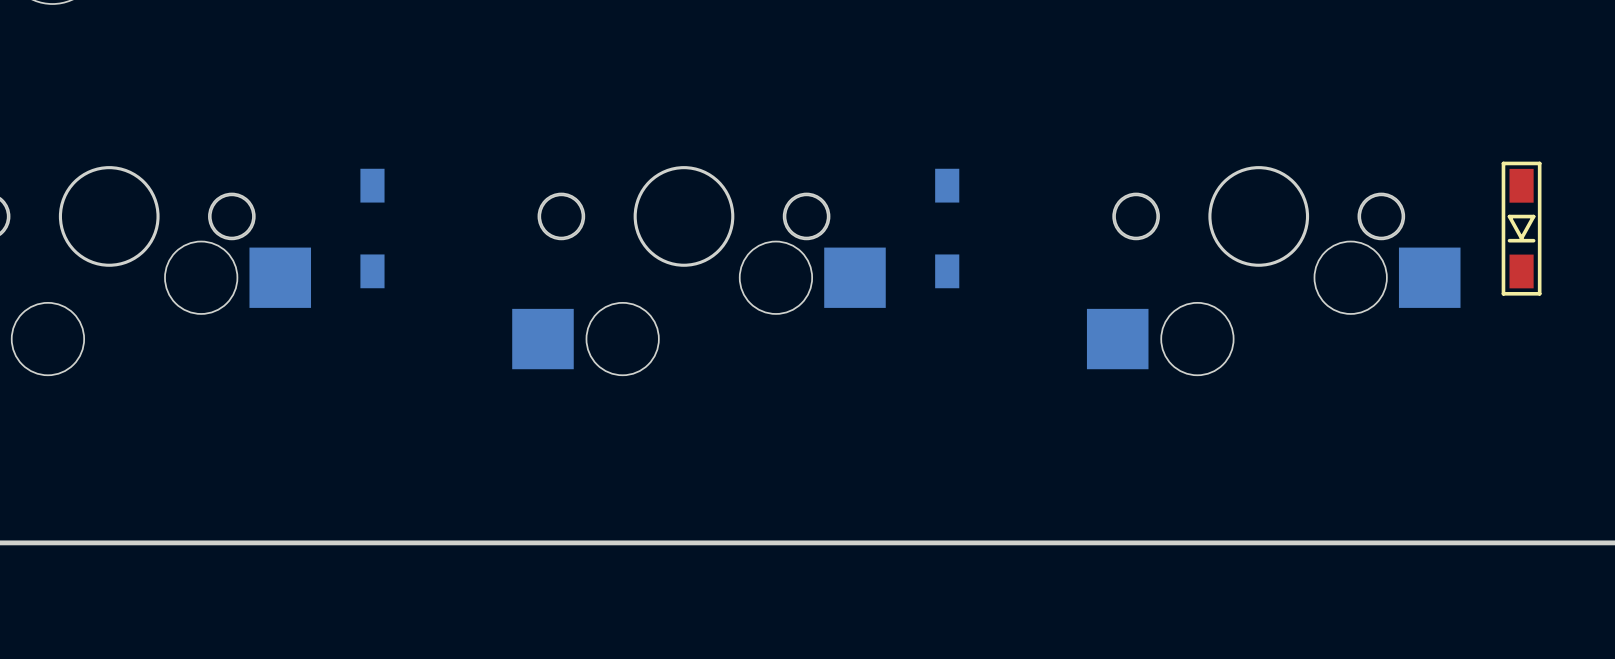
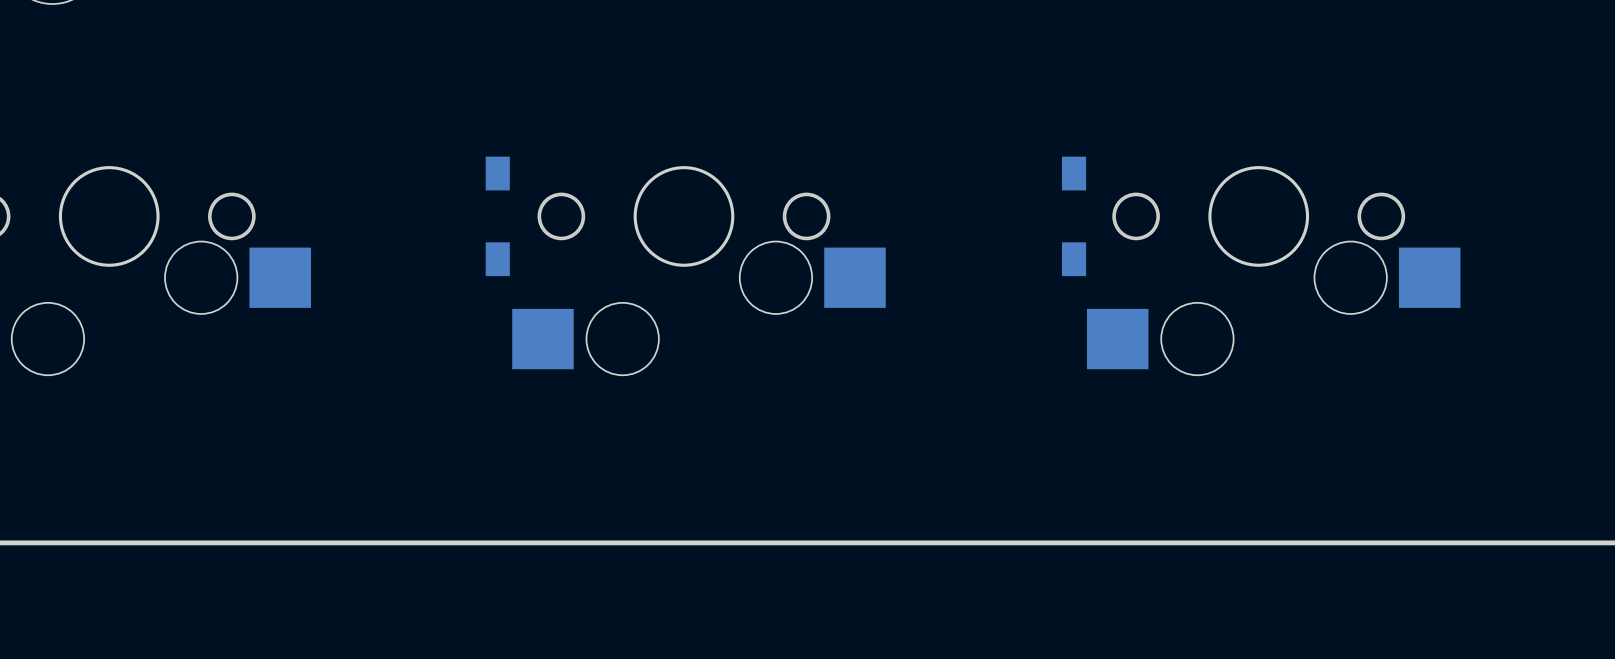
part position: (372, 228) -> (497, 216)
part: (947, 228) -> none
part side: top (1521, 228) -> bottom (1074, 216)

